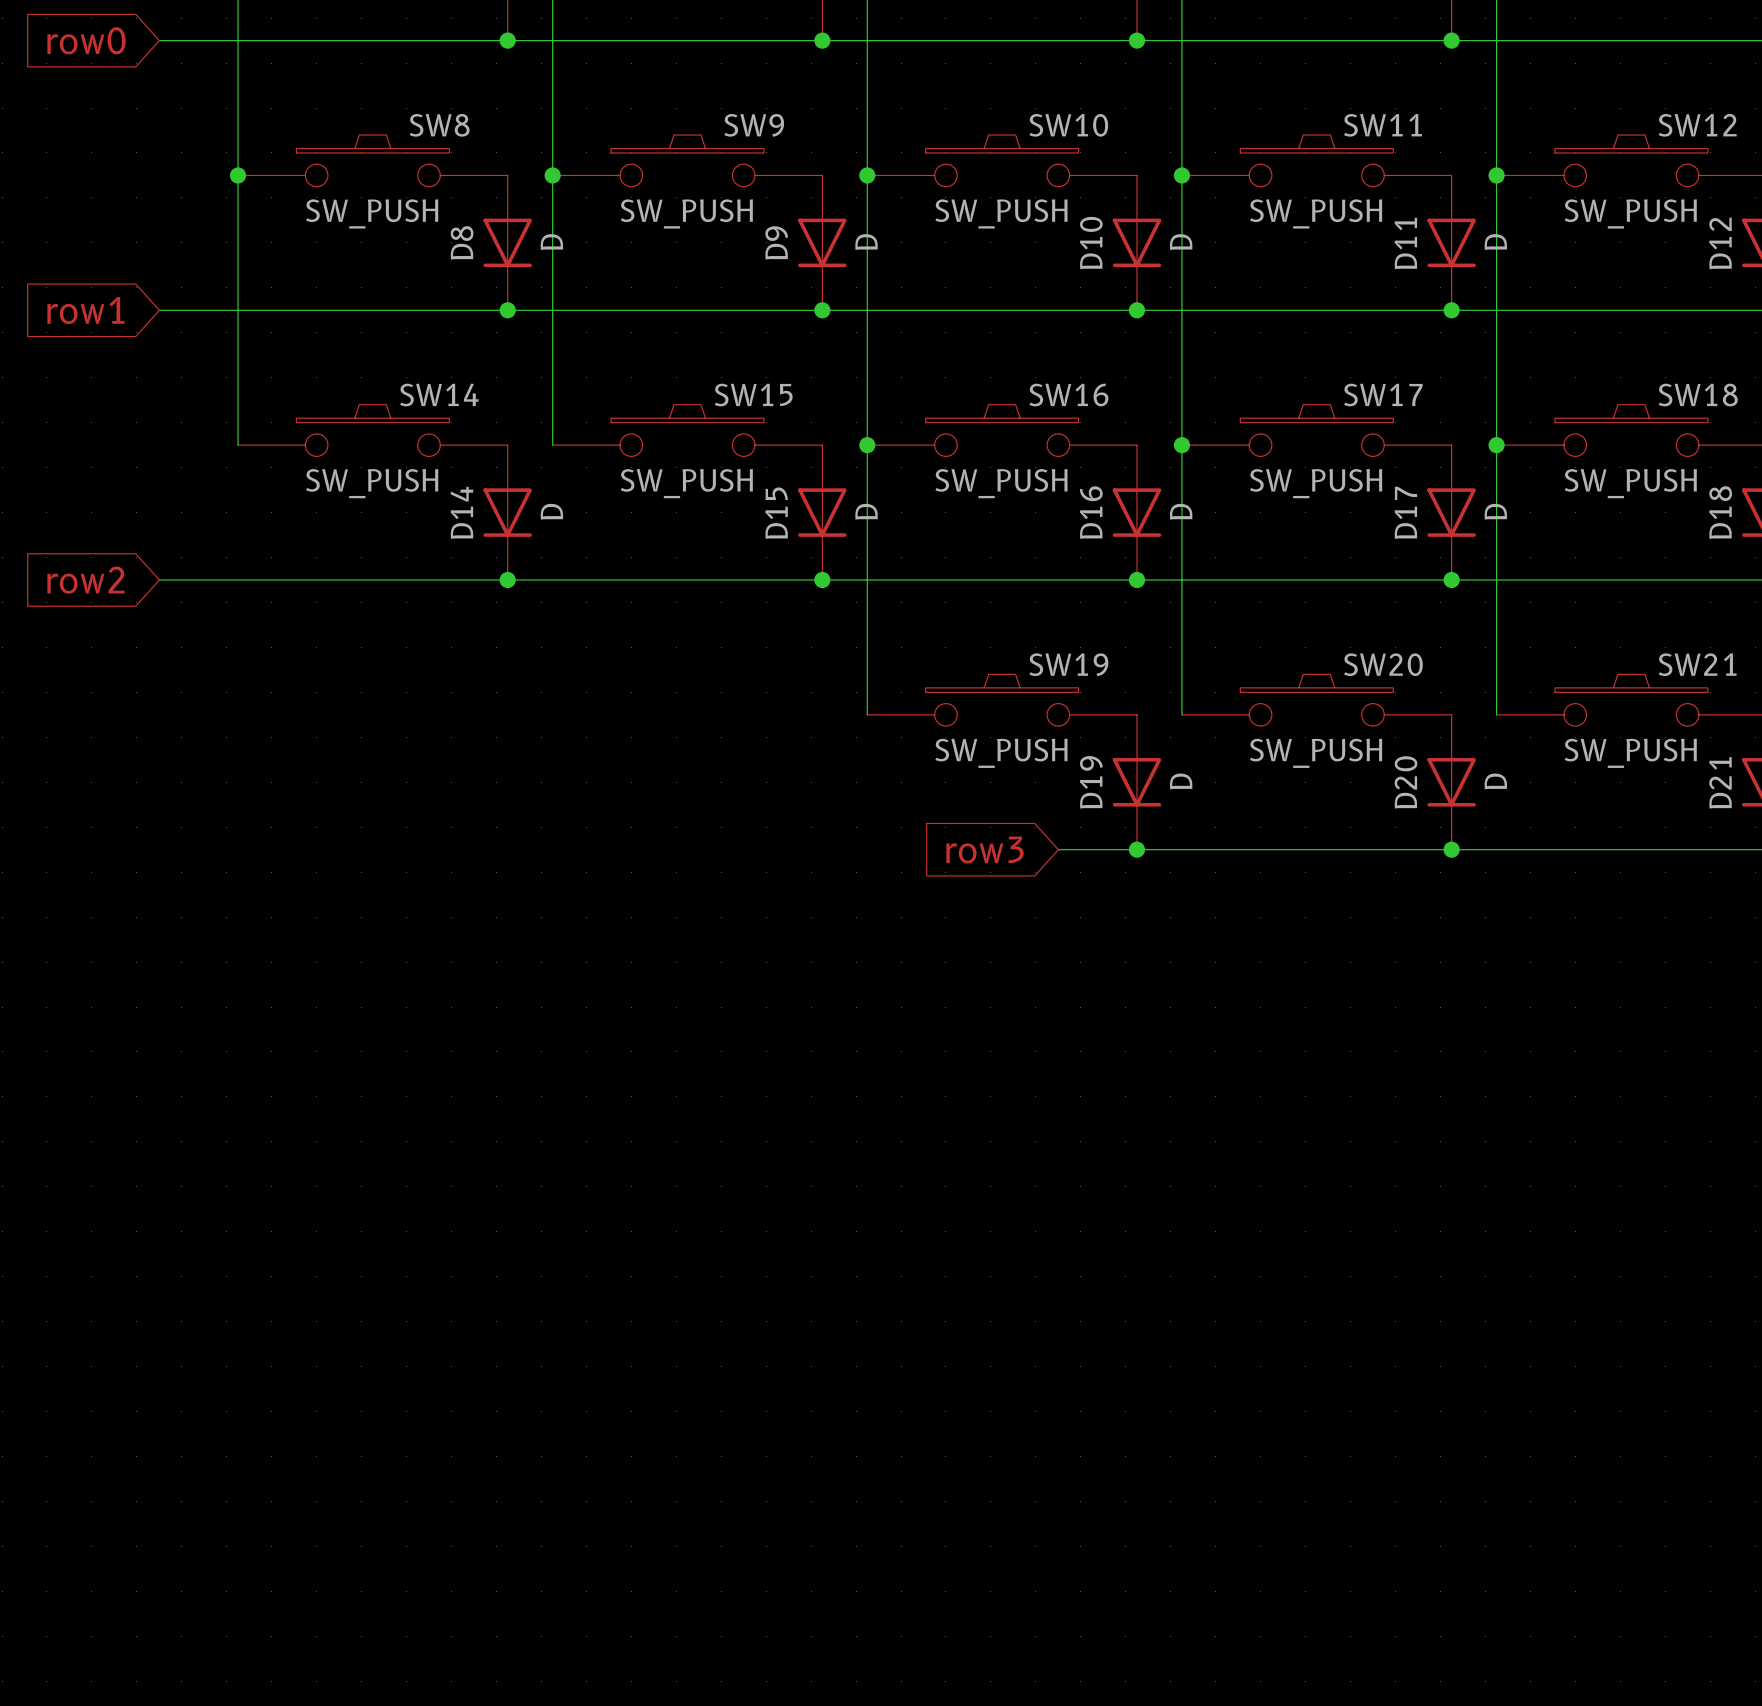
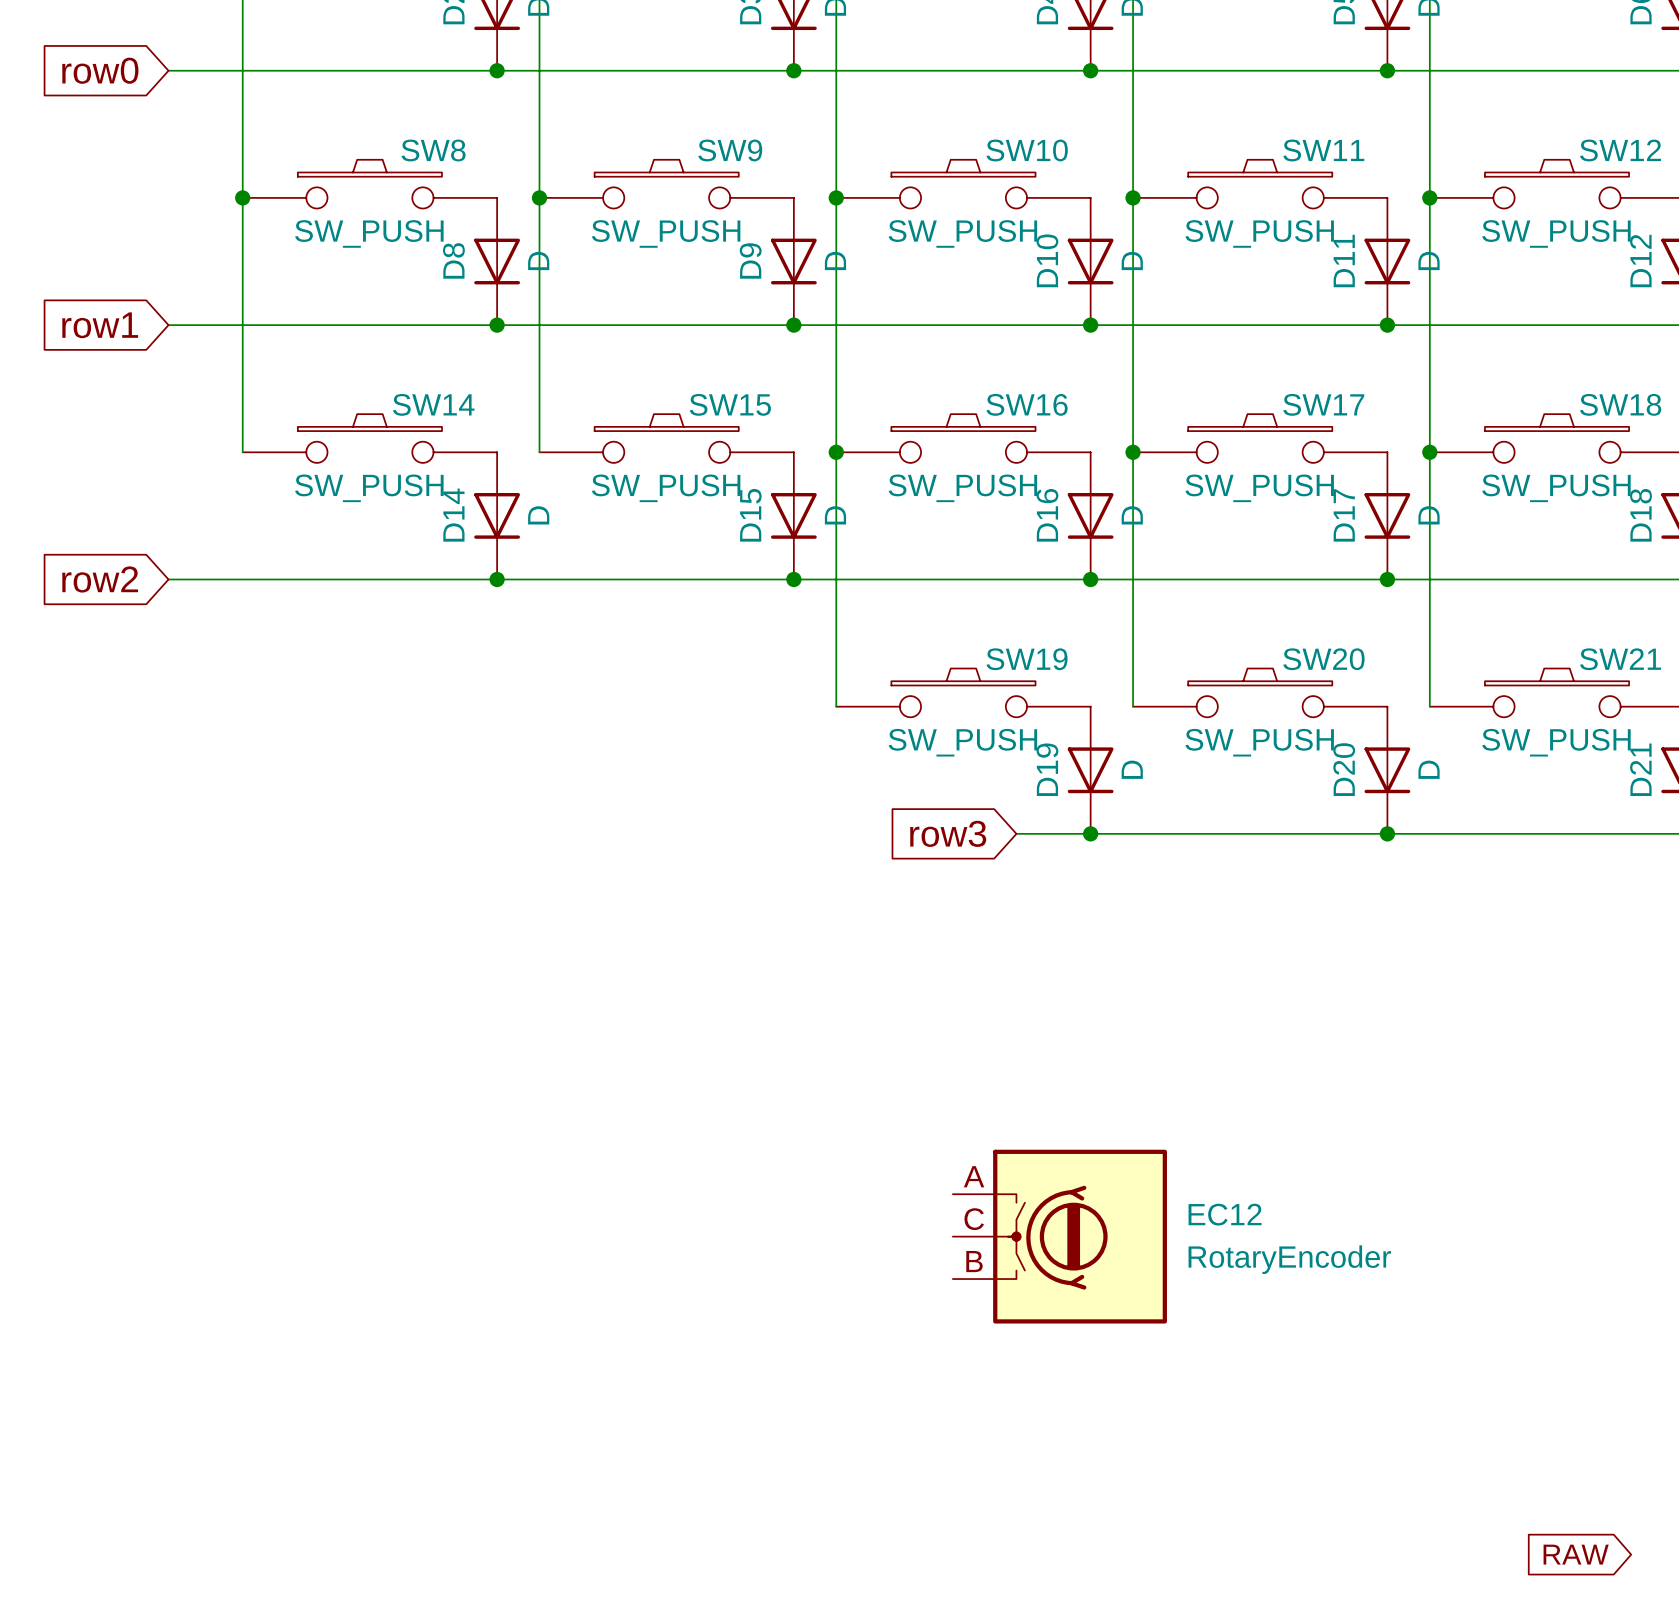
EC12: none -> RotaryEncoder (1059, 1236)
global label: none -> RAW (1576, 1554)

